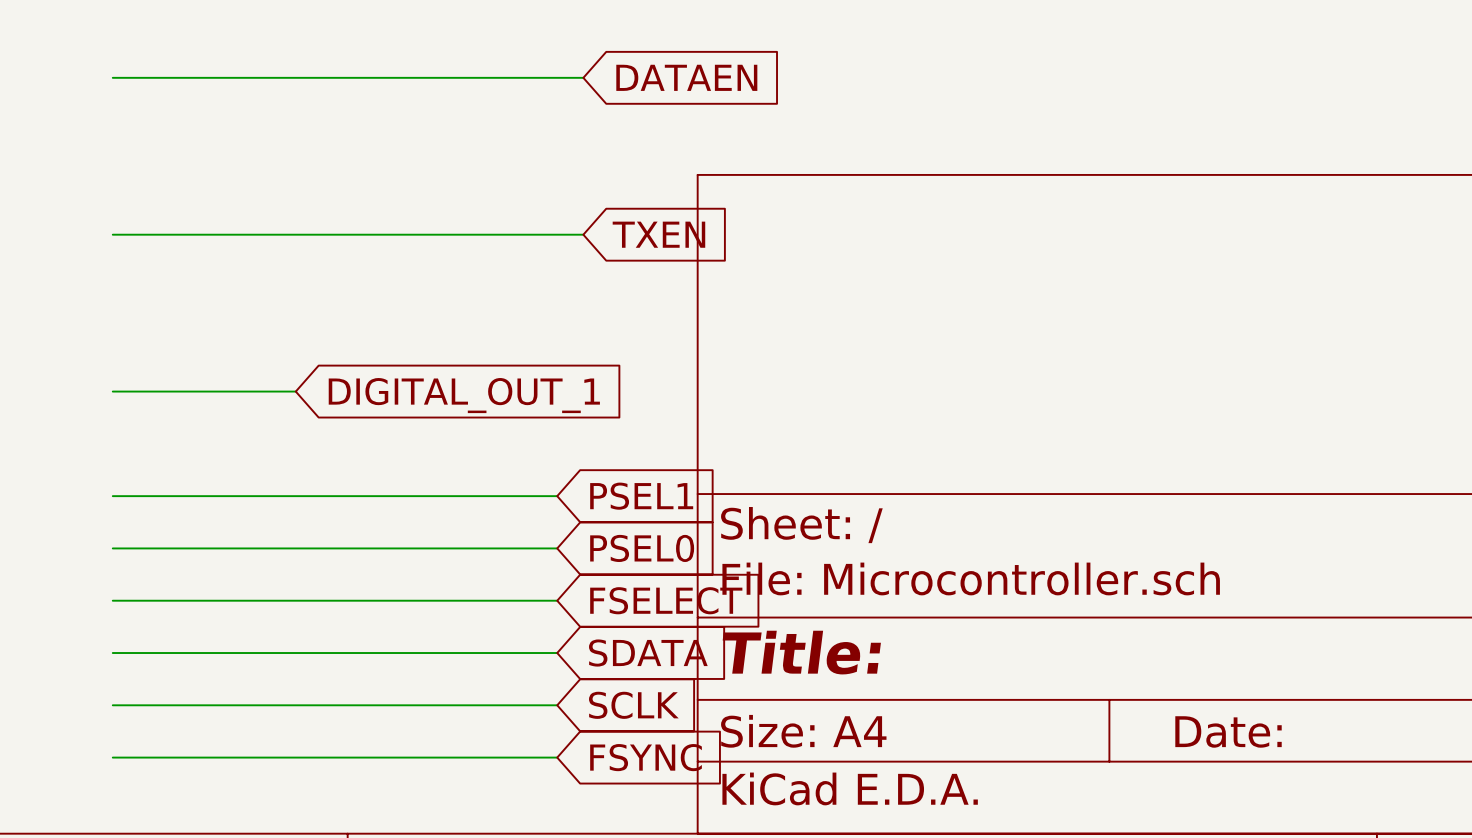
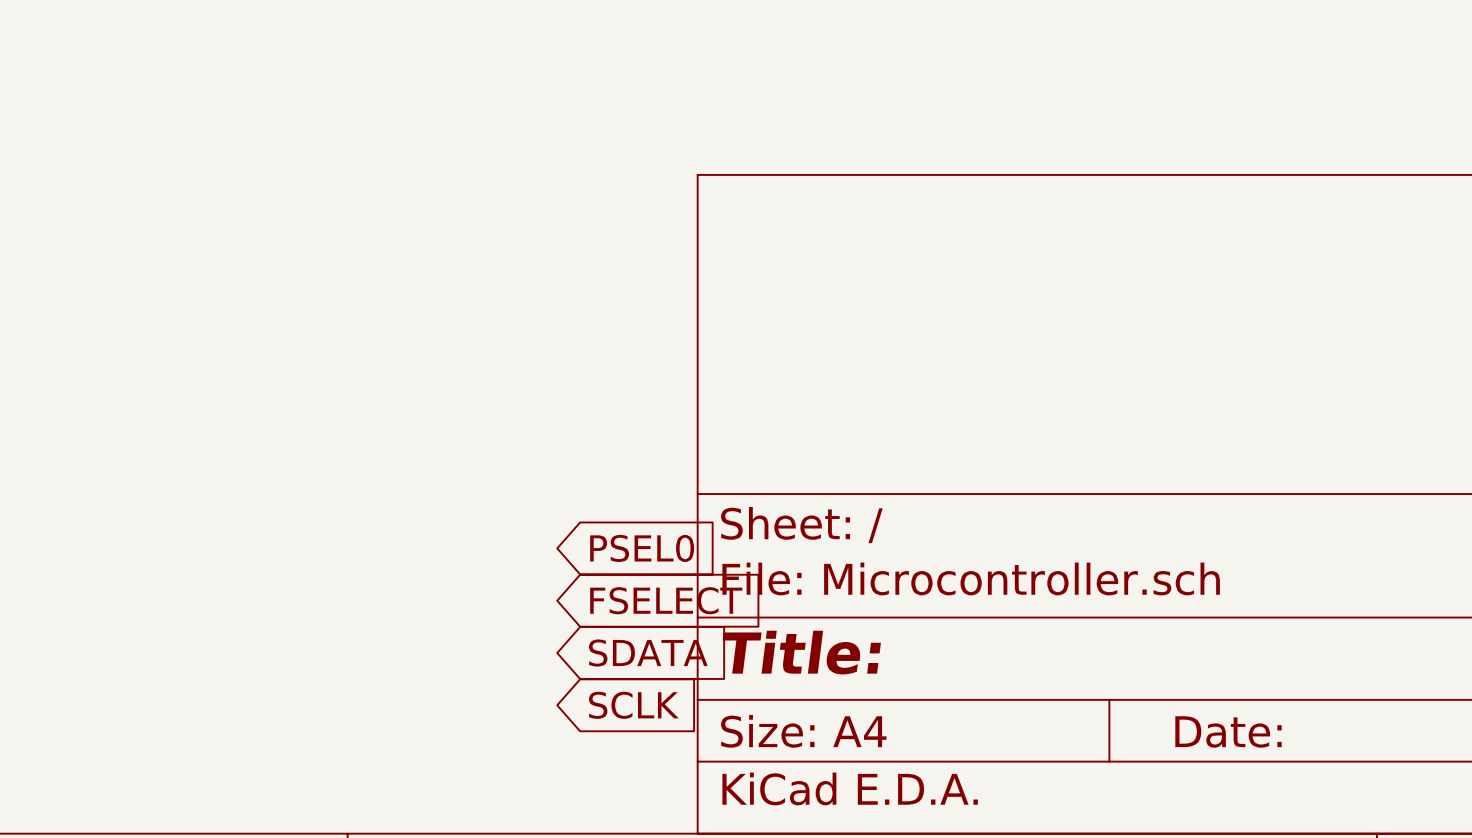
wire: (112, 77) (583, 77) -> none
global label: DATAEN (686, 77) -> none
wire: (112, 234) (583, 234) -> none
global label: TXEN (658, 234) -> none
wire: (112, 391) (295, 391) -> none
global label: DIGITAL_OUT_1 (464, 395) -> none
wire: (112, 496) (557, 496) -> none
global label: PSEL1 (641, 496) -> none
wire: (112, 548) (557, 548) -> none
wire: (112, 600) (557, 600) -> none
wire: (112, 653) (557, 653) -> none
wire: (112, 705) (557, 705) -> none
wire: (112, 757) (557, 757) -> none
global label: FSYNC (646, 757) -> none

